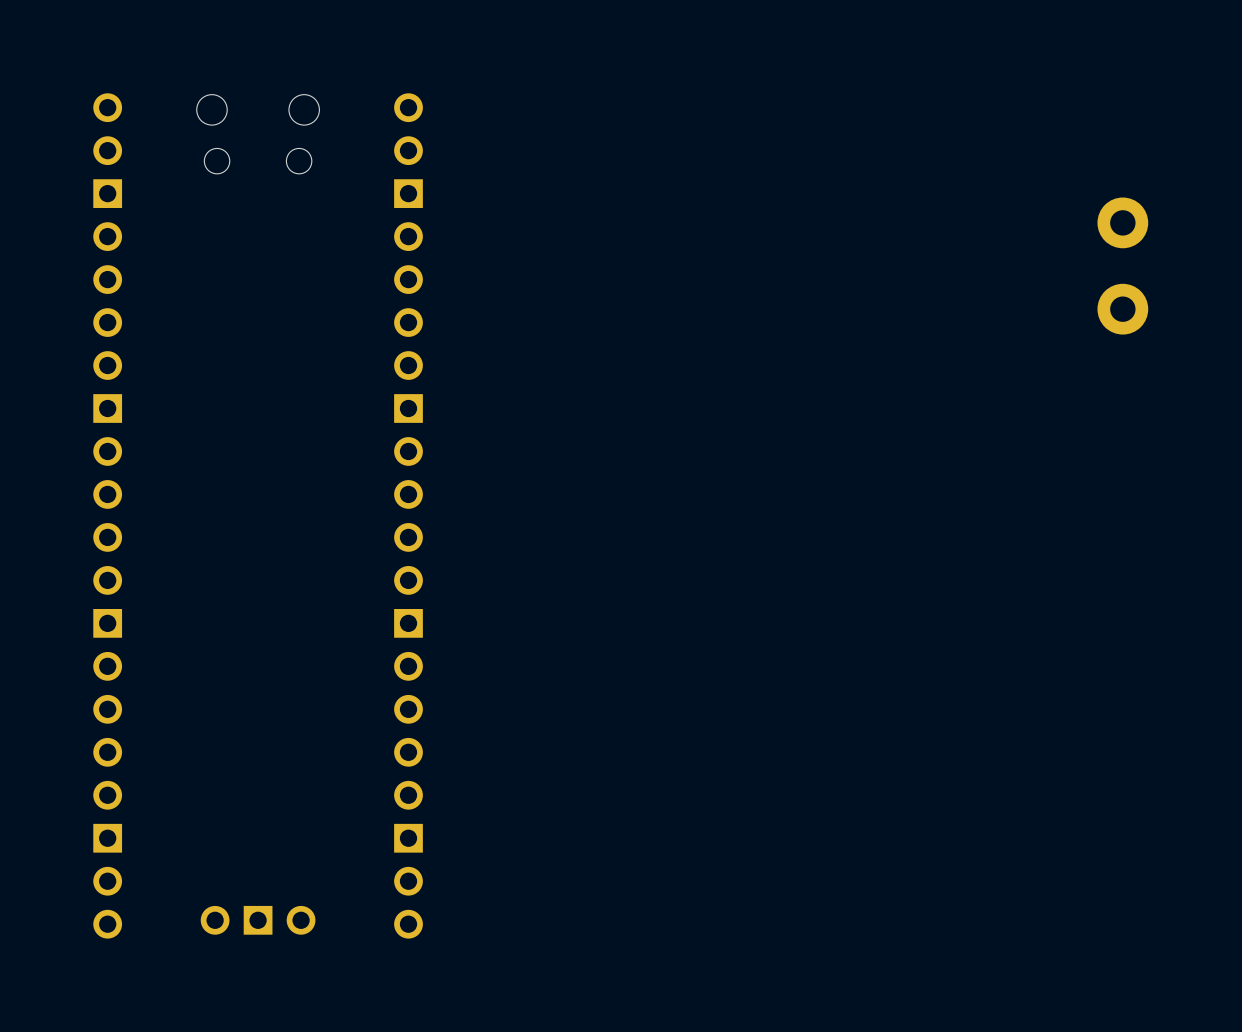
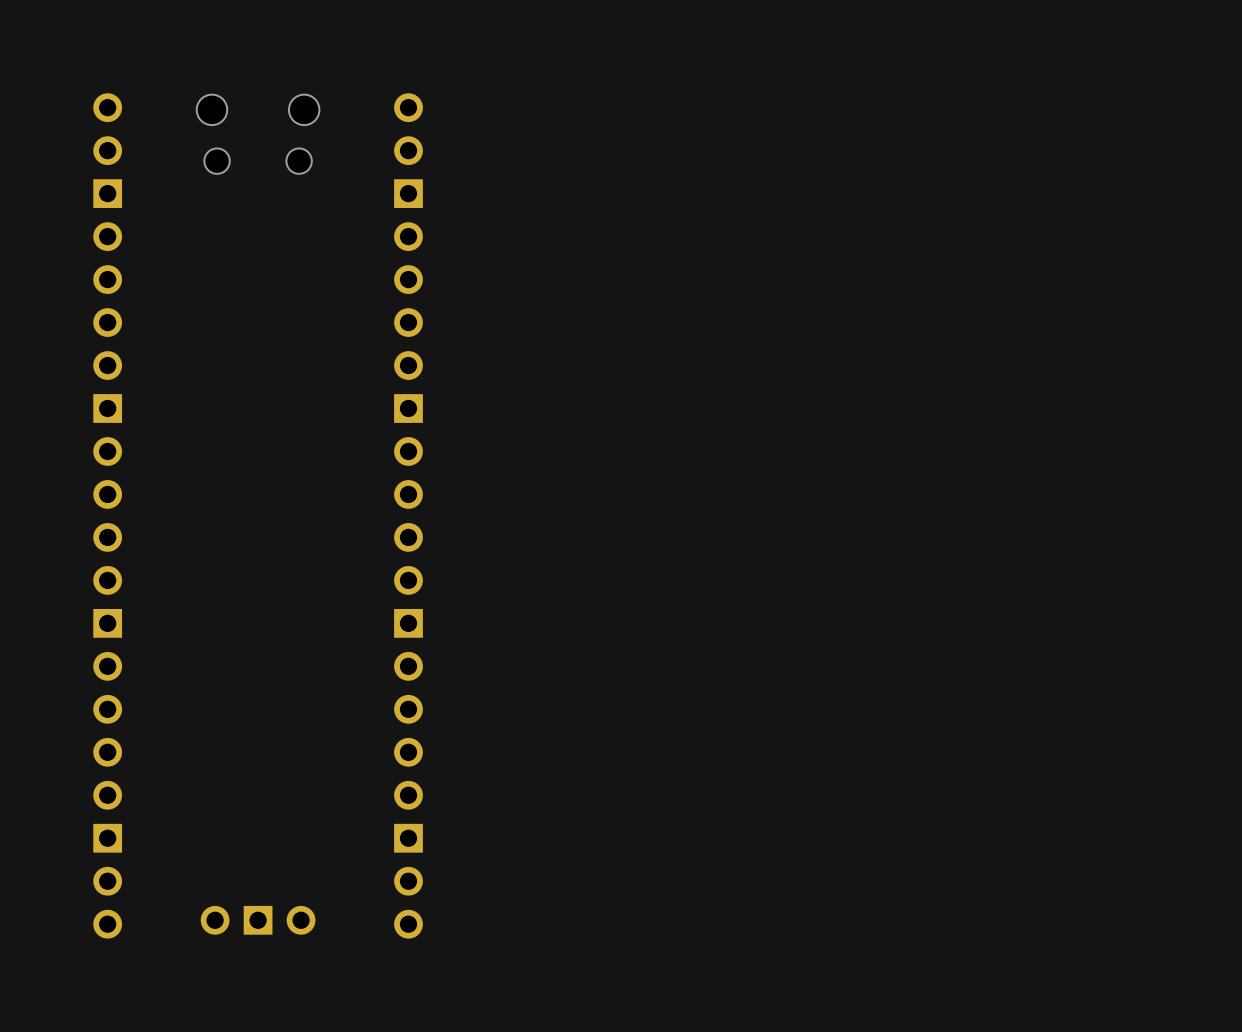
part: (1122, 266) -> none

